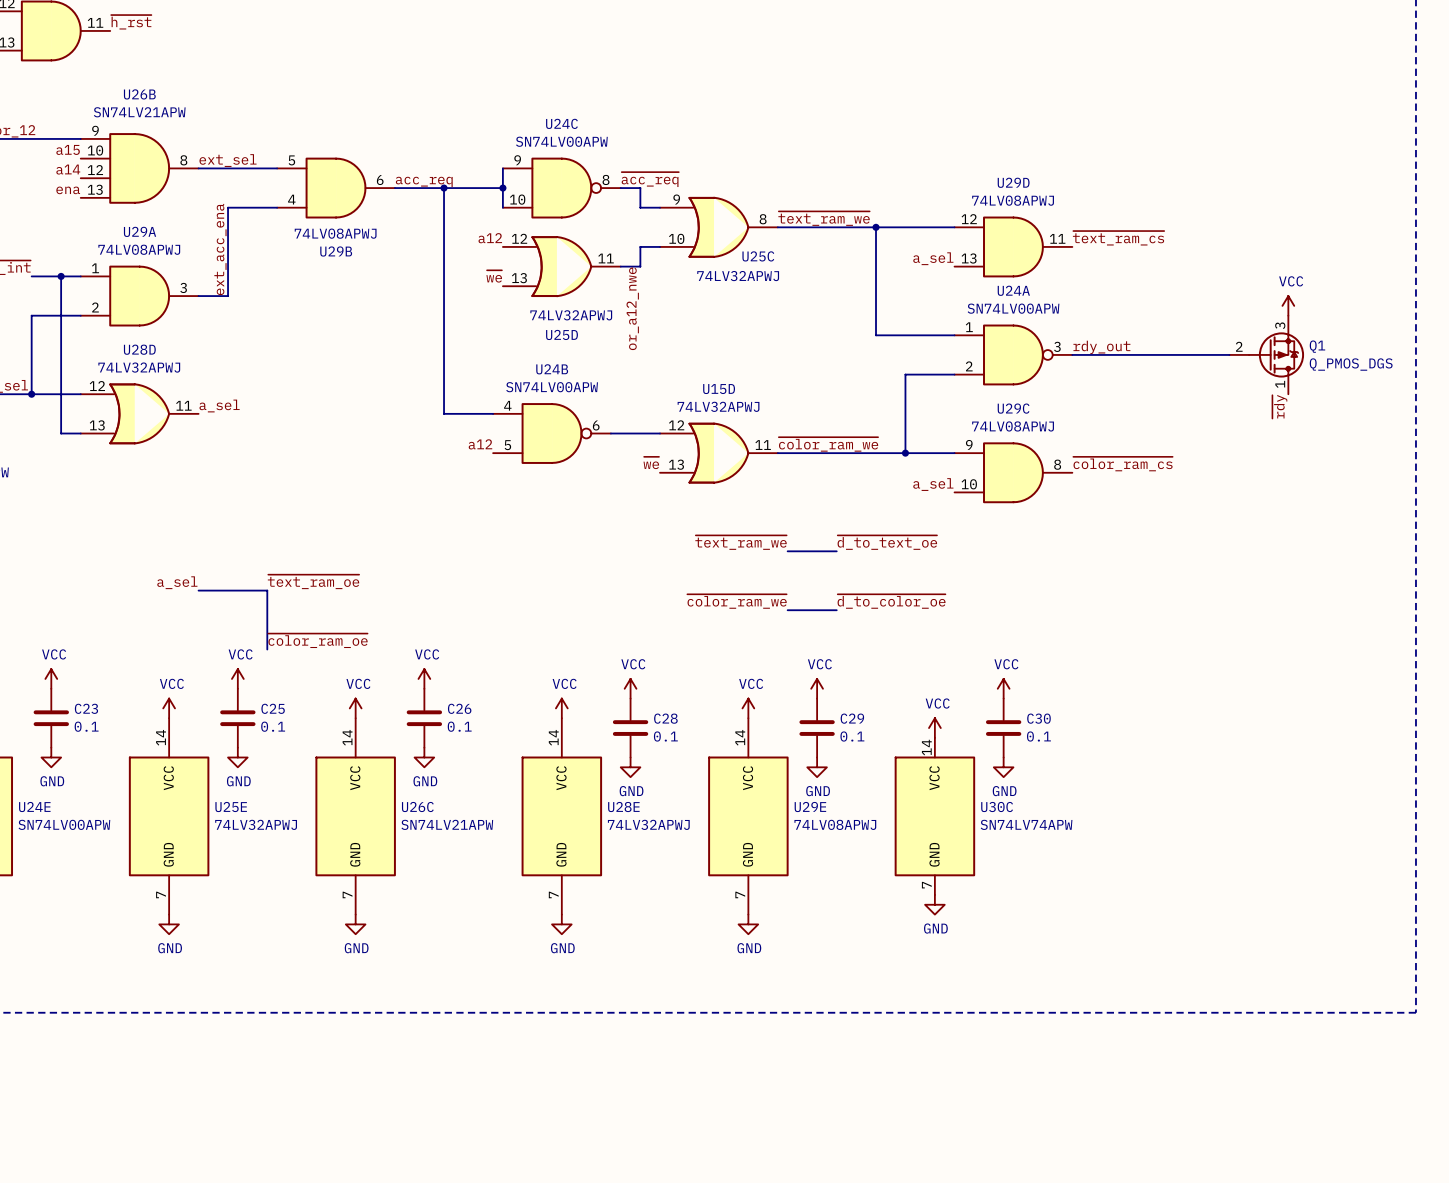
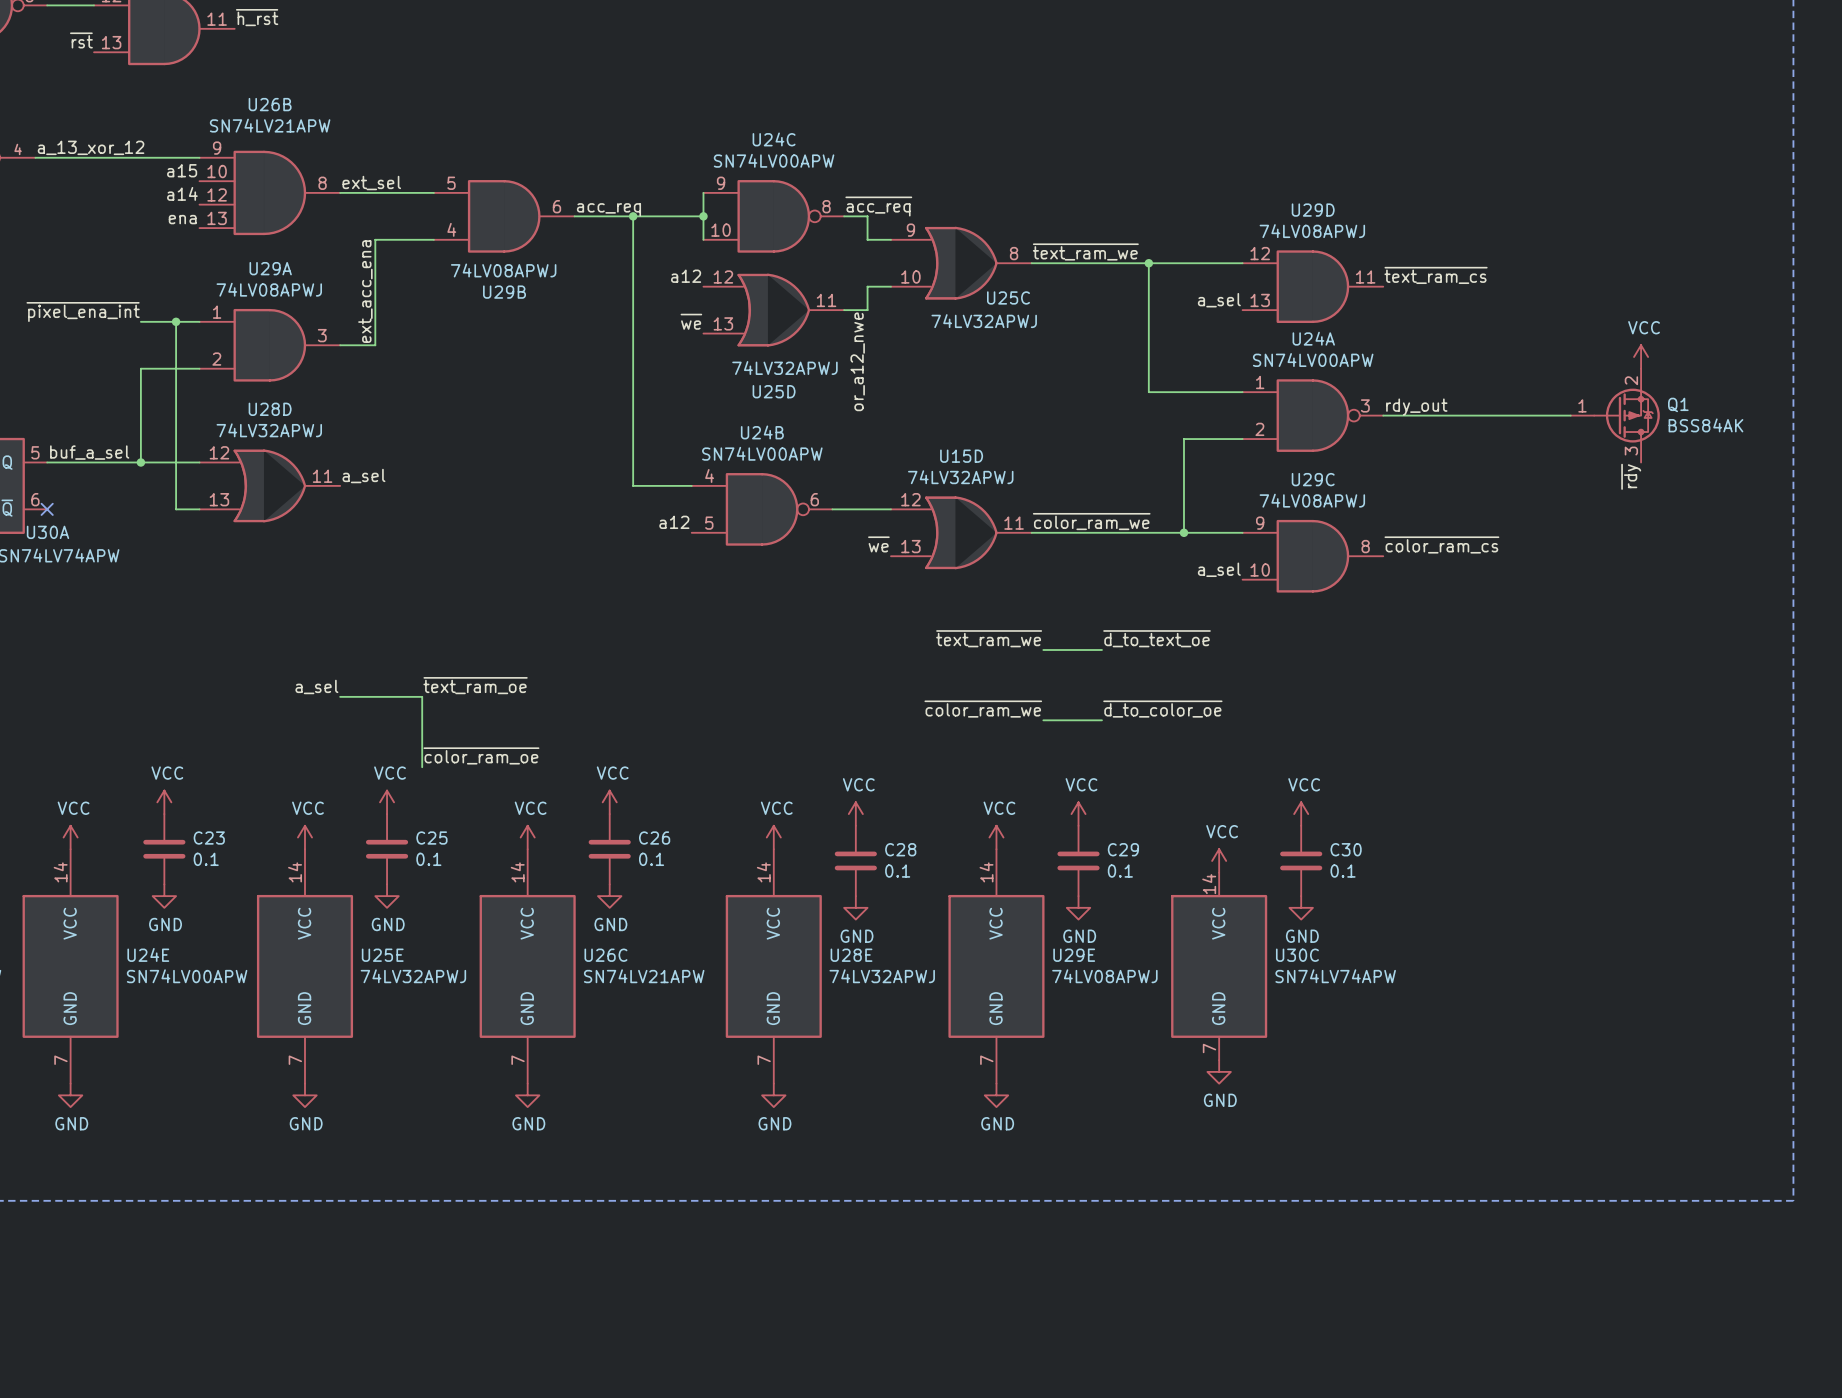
Q1 pin number: 3 (1280, 325) -> 2 (1631, 380)
Q1 pin number: 2 (1239, 346) -> 1 (1582, 405)
Q1 value: Q_PMOS_DGS (1351, 364) -> BSS84AK (1705, 425)
Q1 pin number: 1 (1280, 384) -> 3 (1631, 451)

